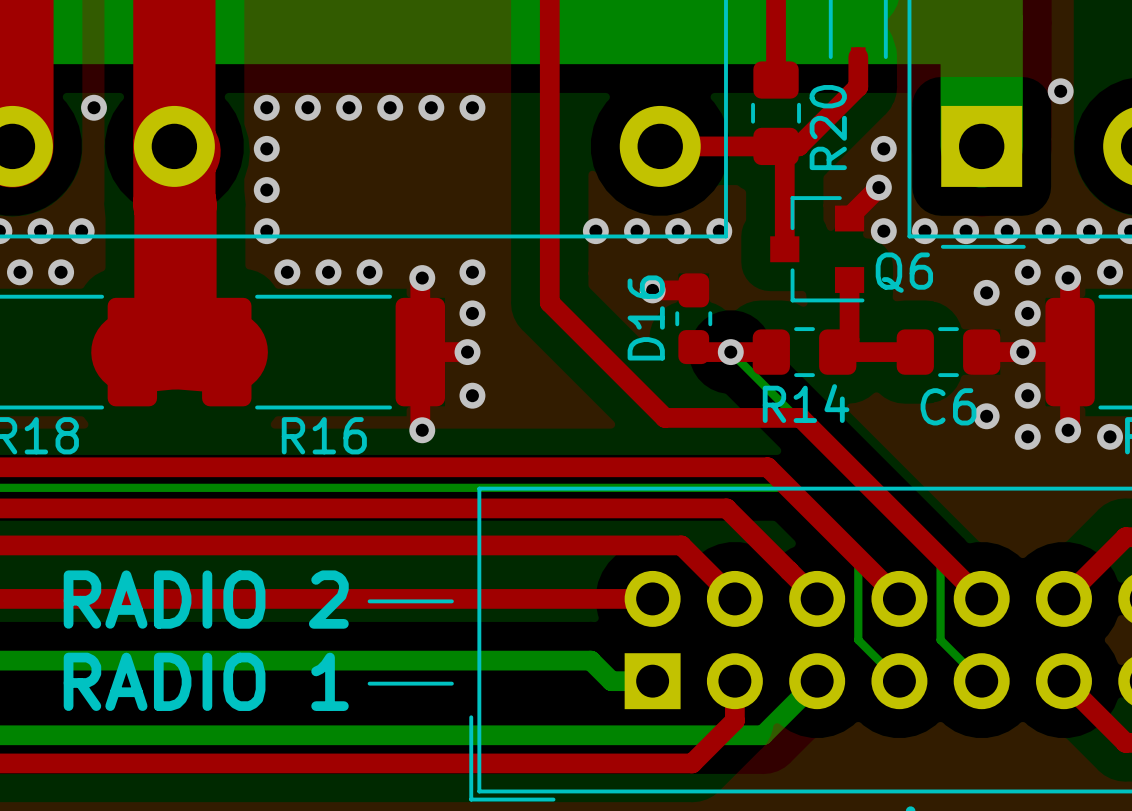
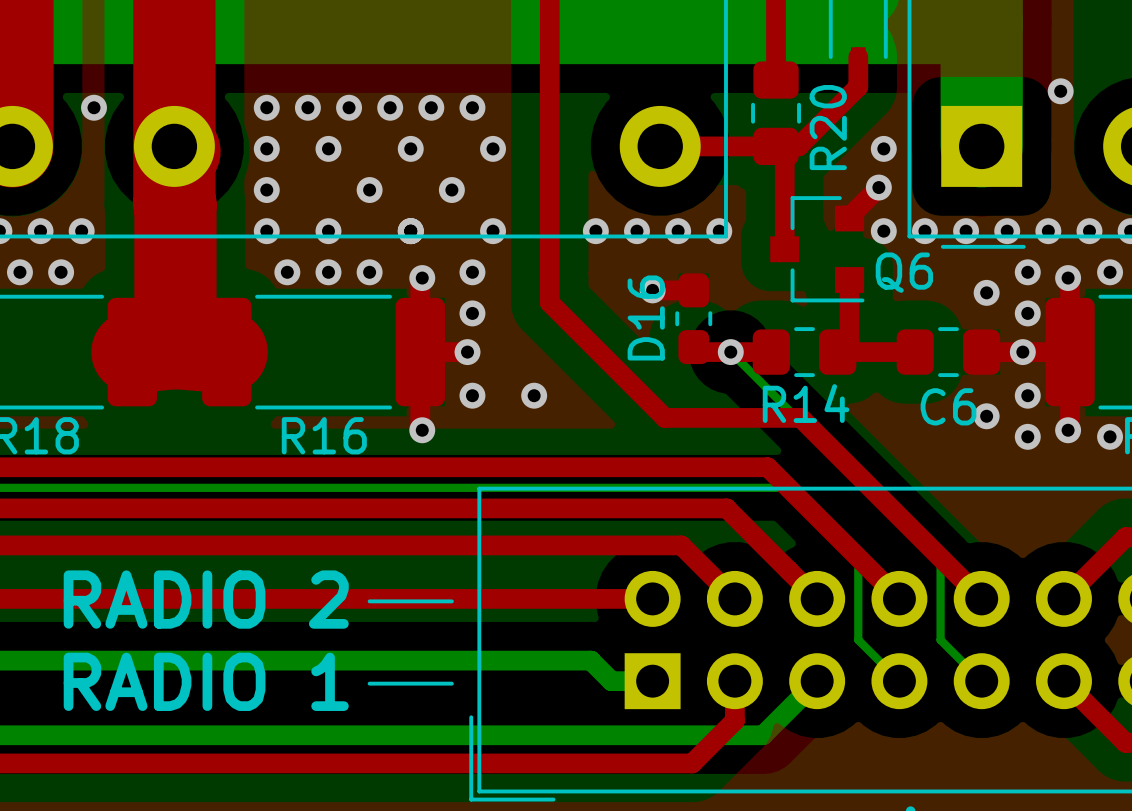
via: none -> (328, 148)
via: none -> (410, 148)
via: none -> (493, 148)
via: none -> (369, 190)
via: none -> (451, 190)
via: none -> (328, 231)
via: none -> (410, 231)
via: none -> (493, 231)
via: none -> (534, 395)

